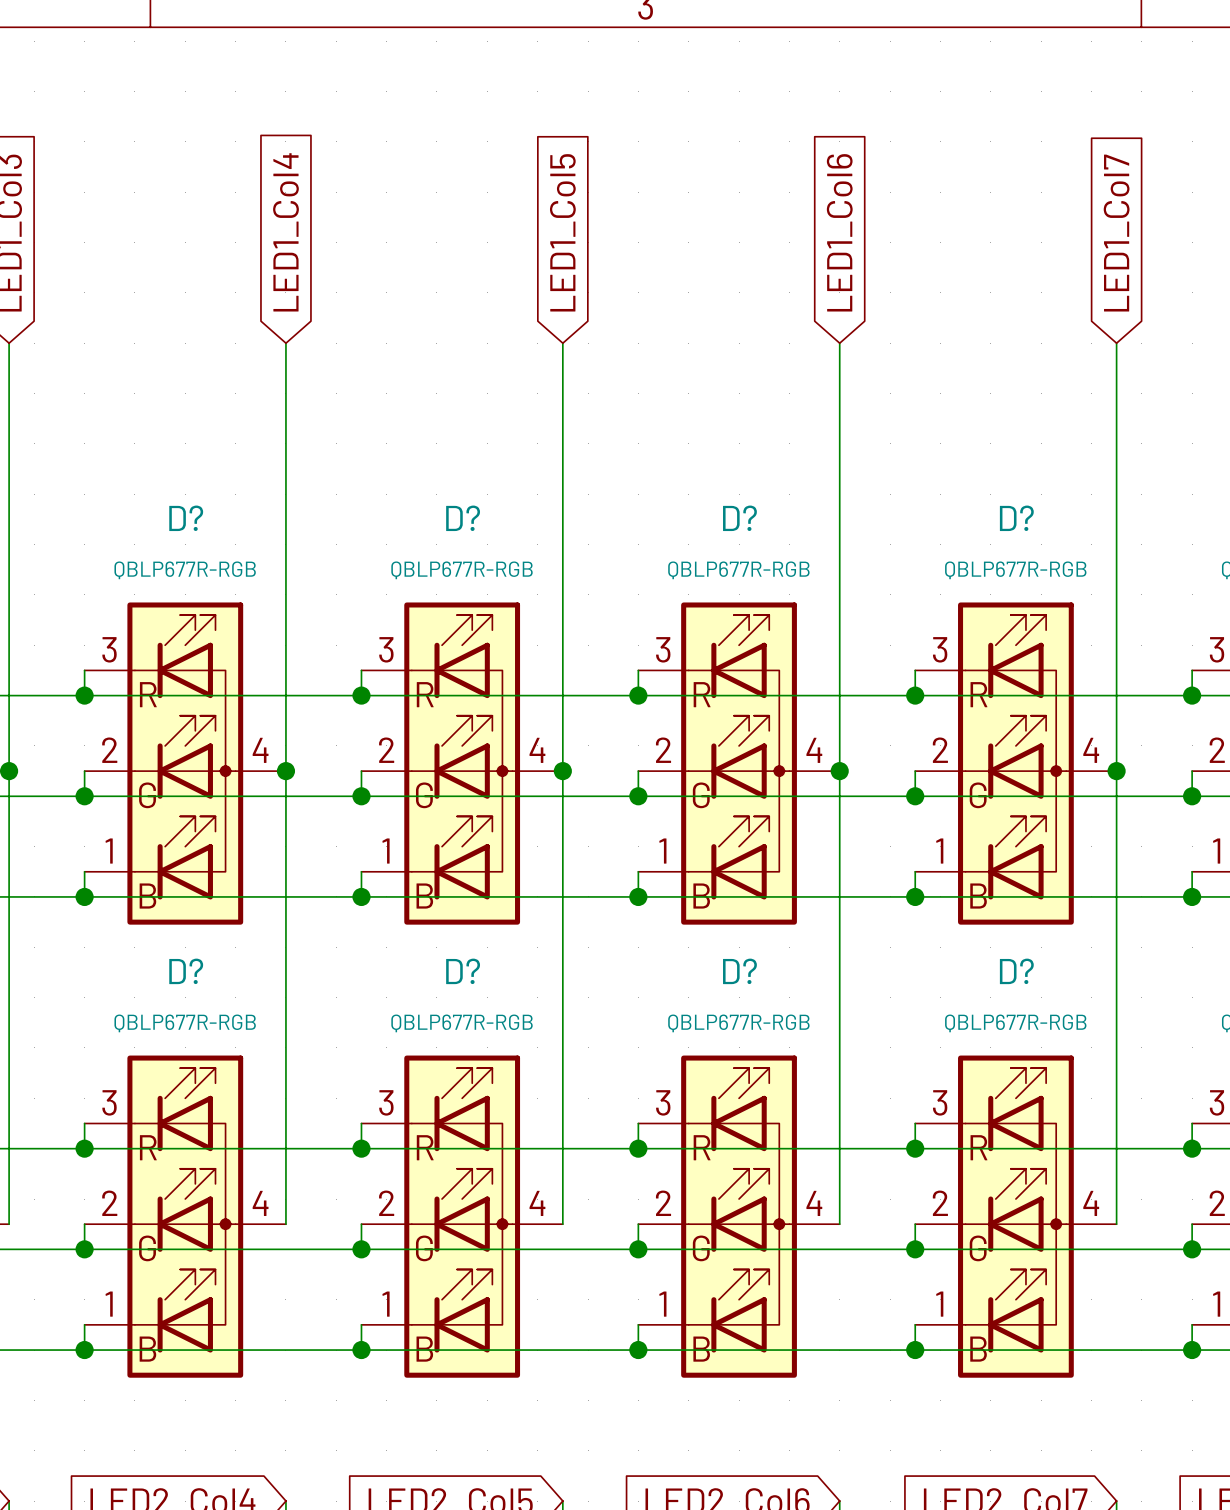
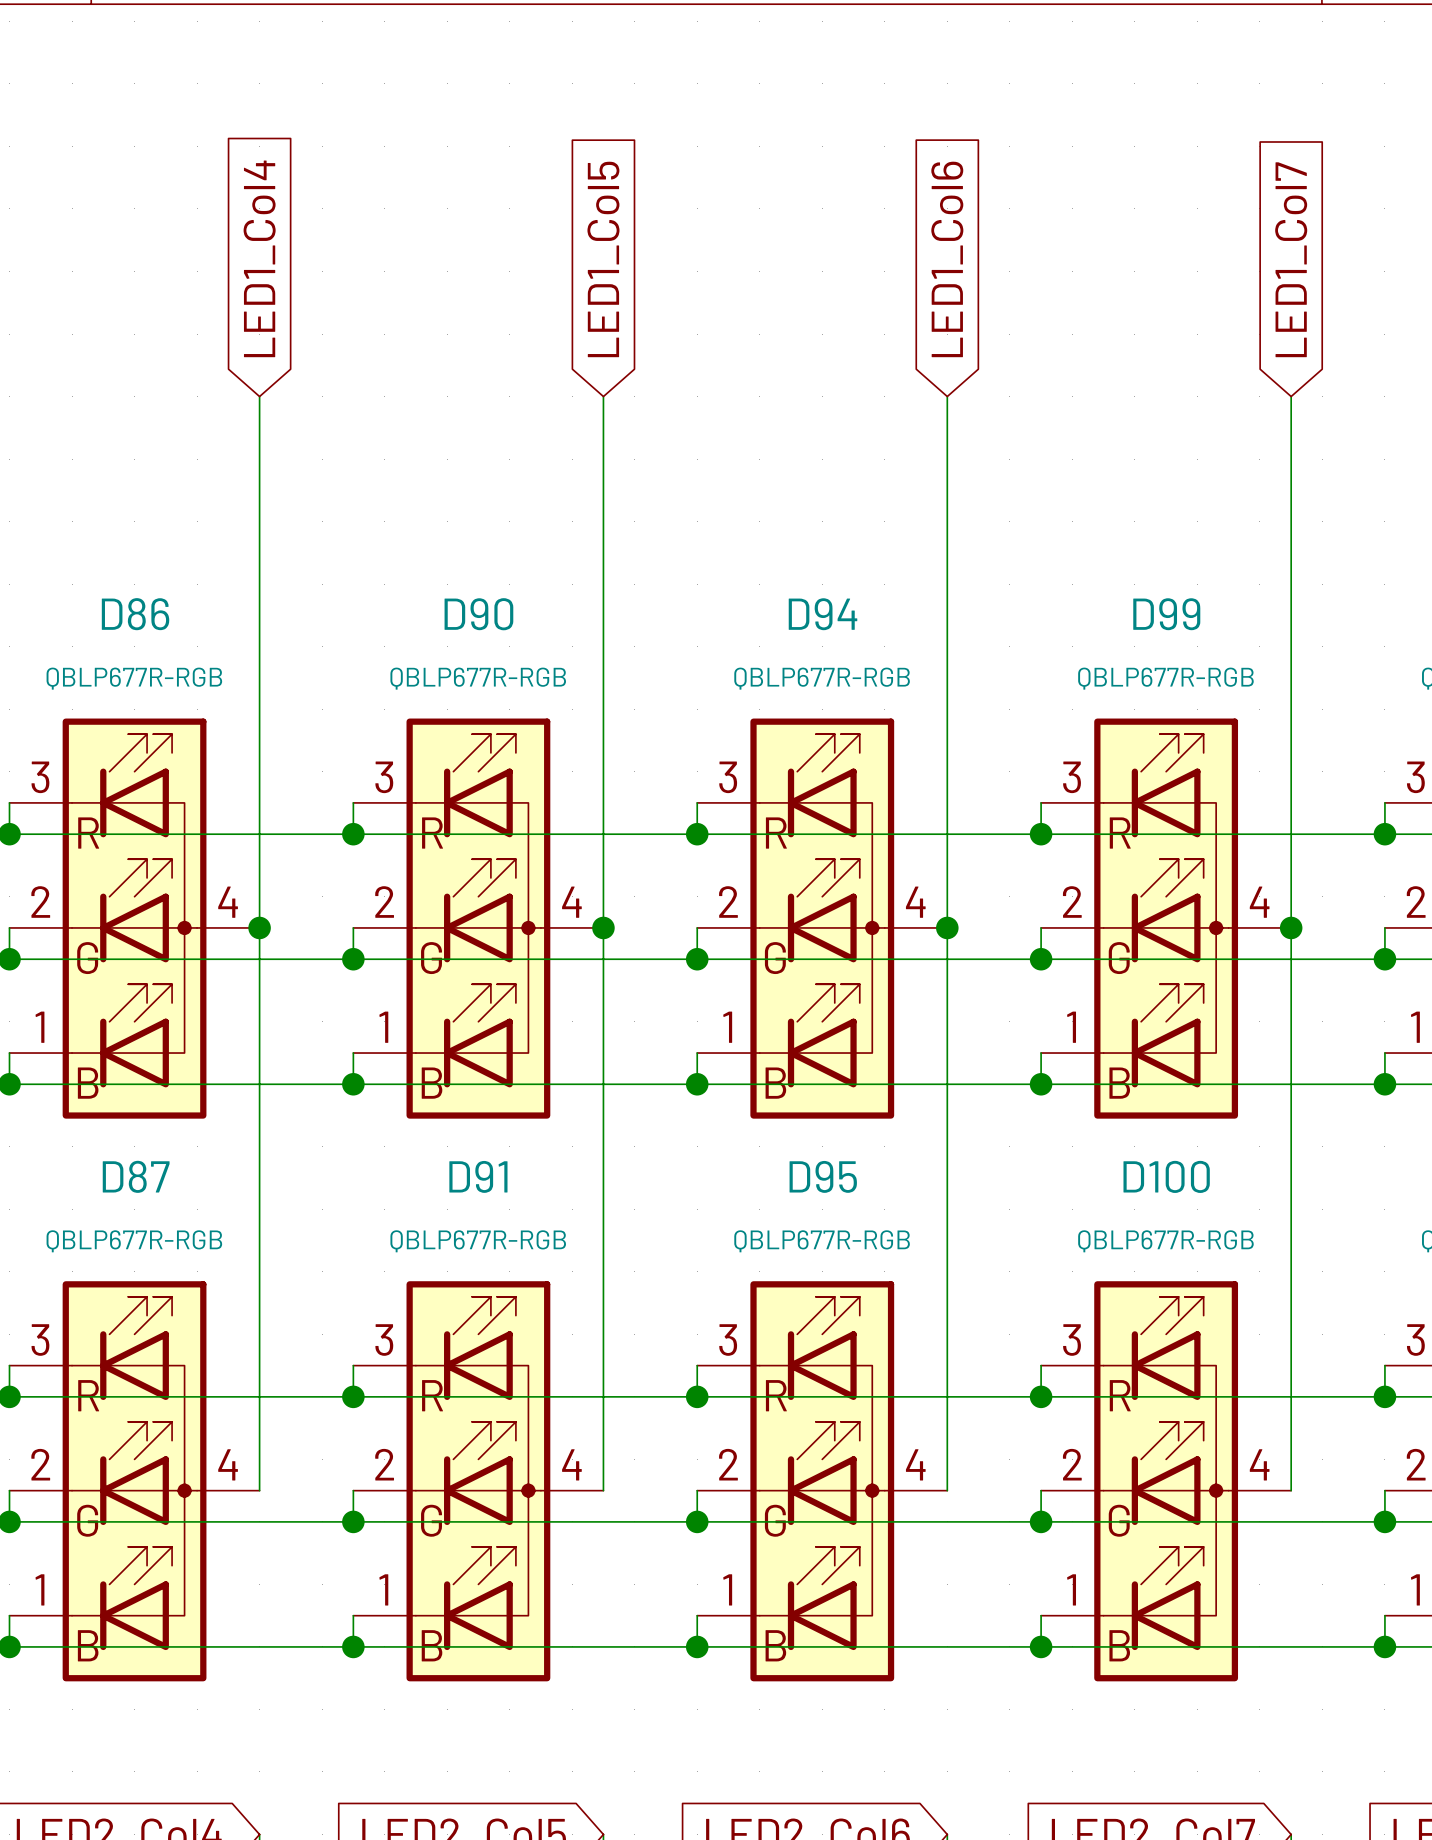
D? name: D? (186, 518) -> D86 (135, 614)
D? name: D? (463, 518) -> D90 (478, 614)
D? name: D? (739, 518) -> D94 (823, 614)
D? name: D? (1016, 518) -> D99 (1166, 614)
D? name: D? (186, 971) -> D87 (136, 1176)
D? name: D? (463, 971) -> D91 (478, 1176)
D? name: D? (739, 971) -> D95 (823, 1176)
D? name: D? (1016, 971) -> D100 (1166, 1176)

